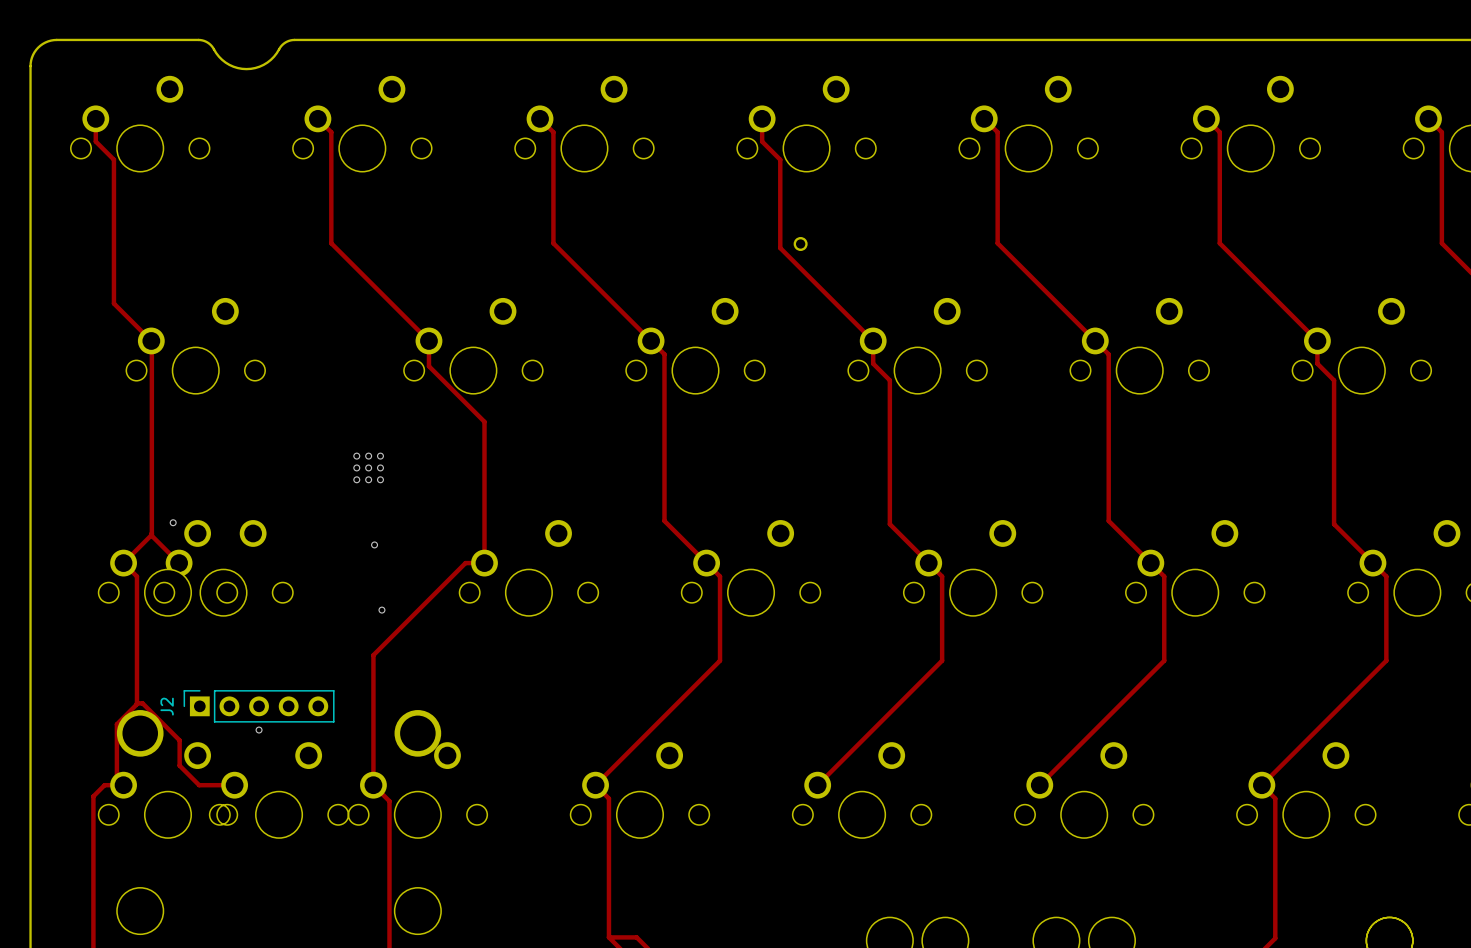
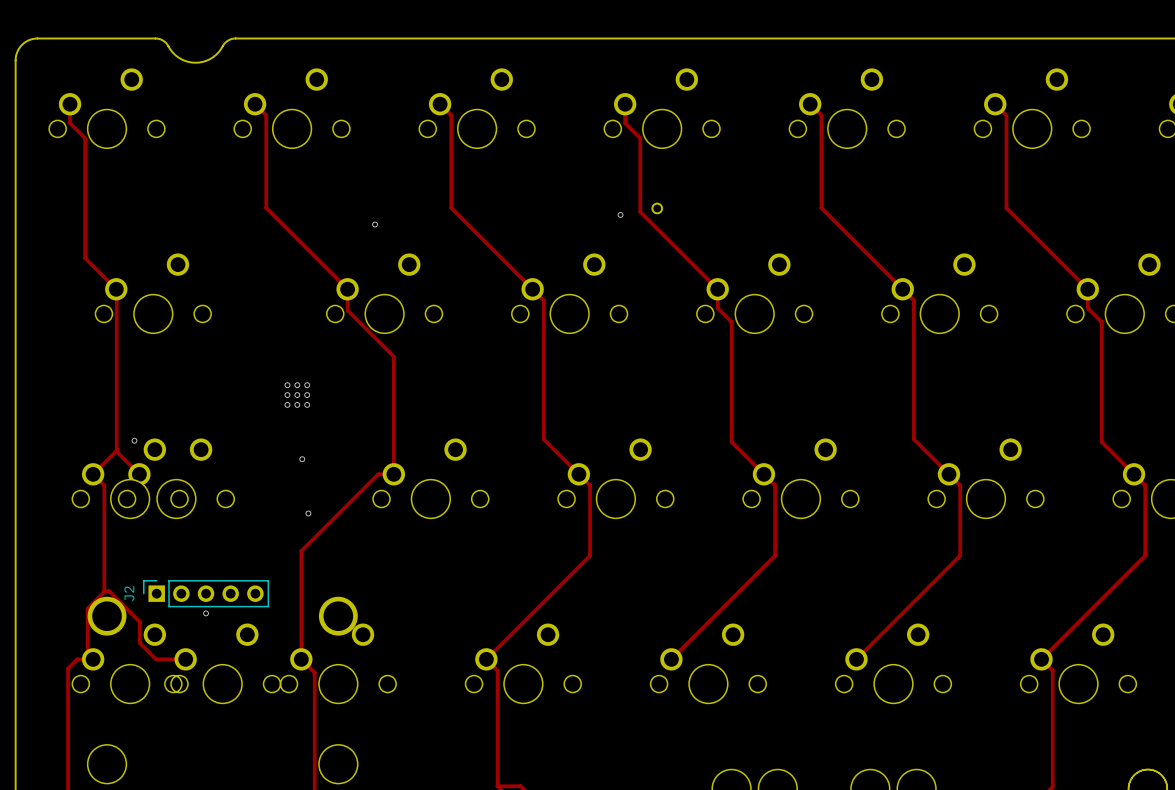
via: none -> (620, 214)
via: none -> (375, 224)

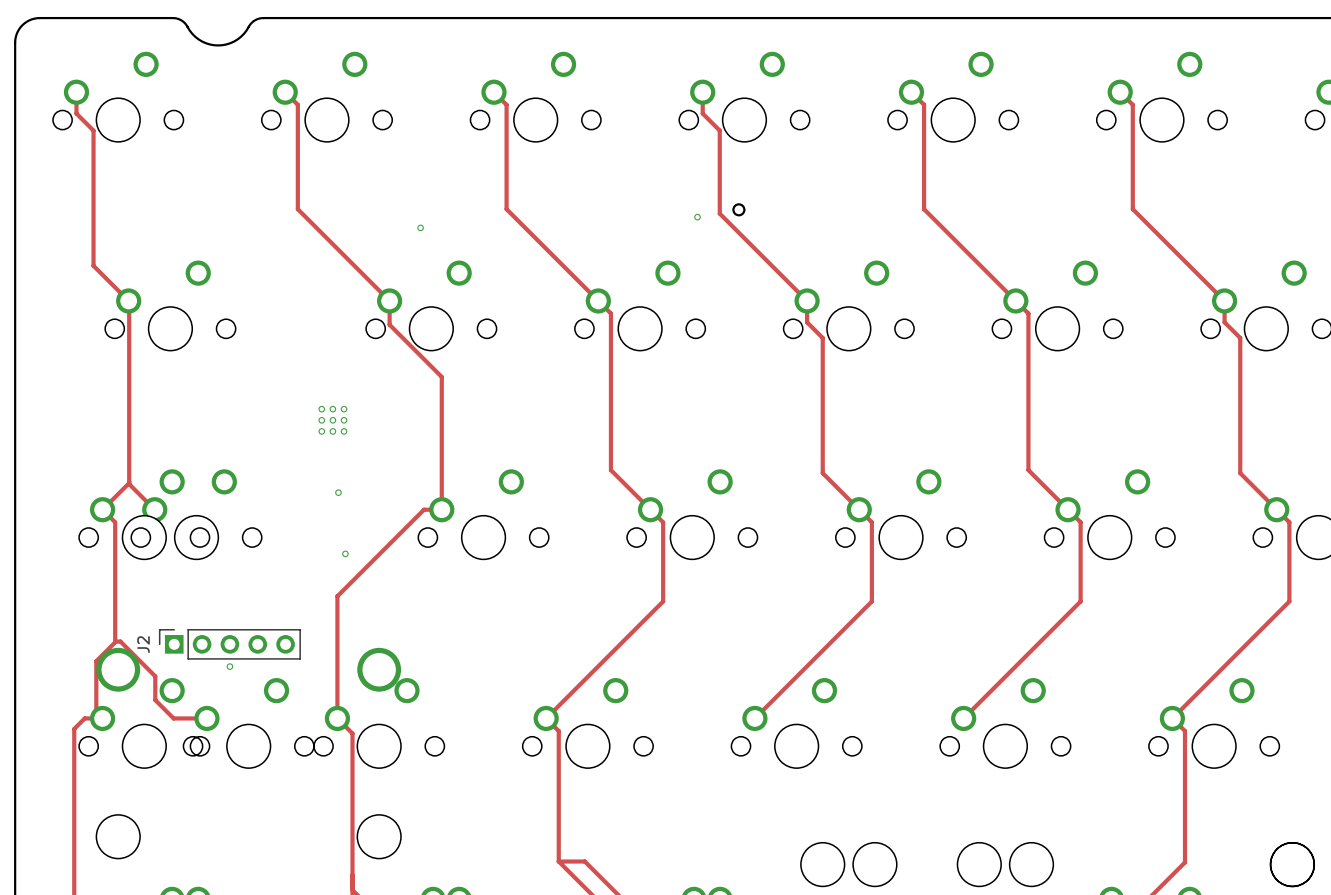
via: (134, 440) -> none

